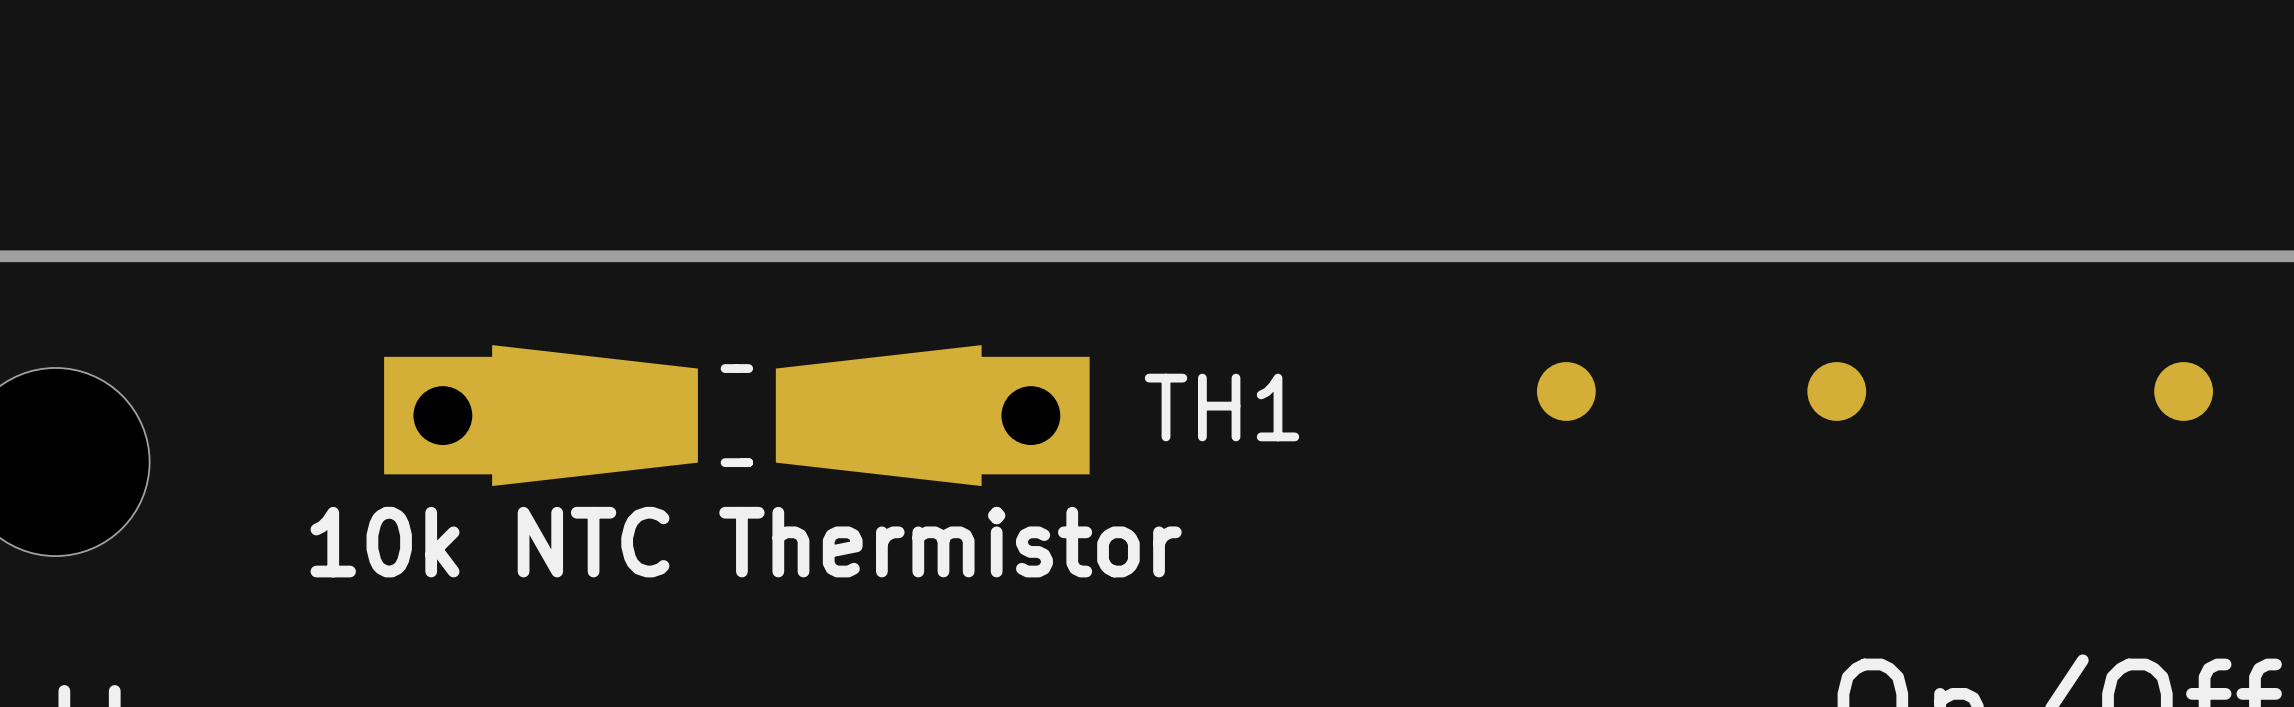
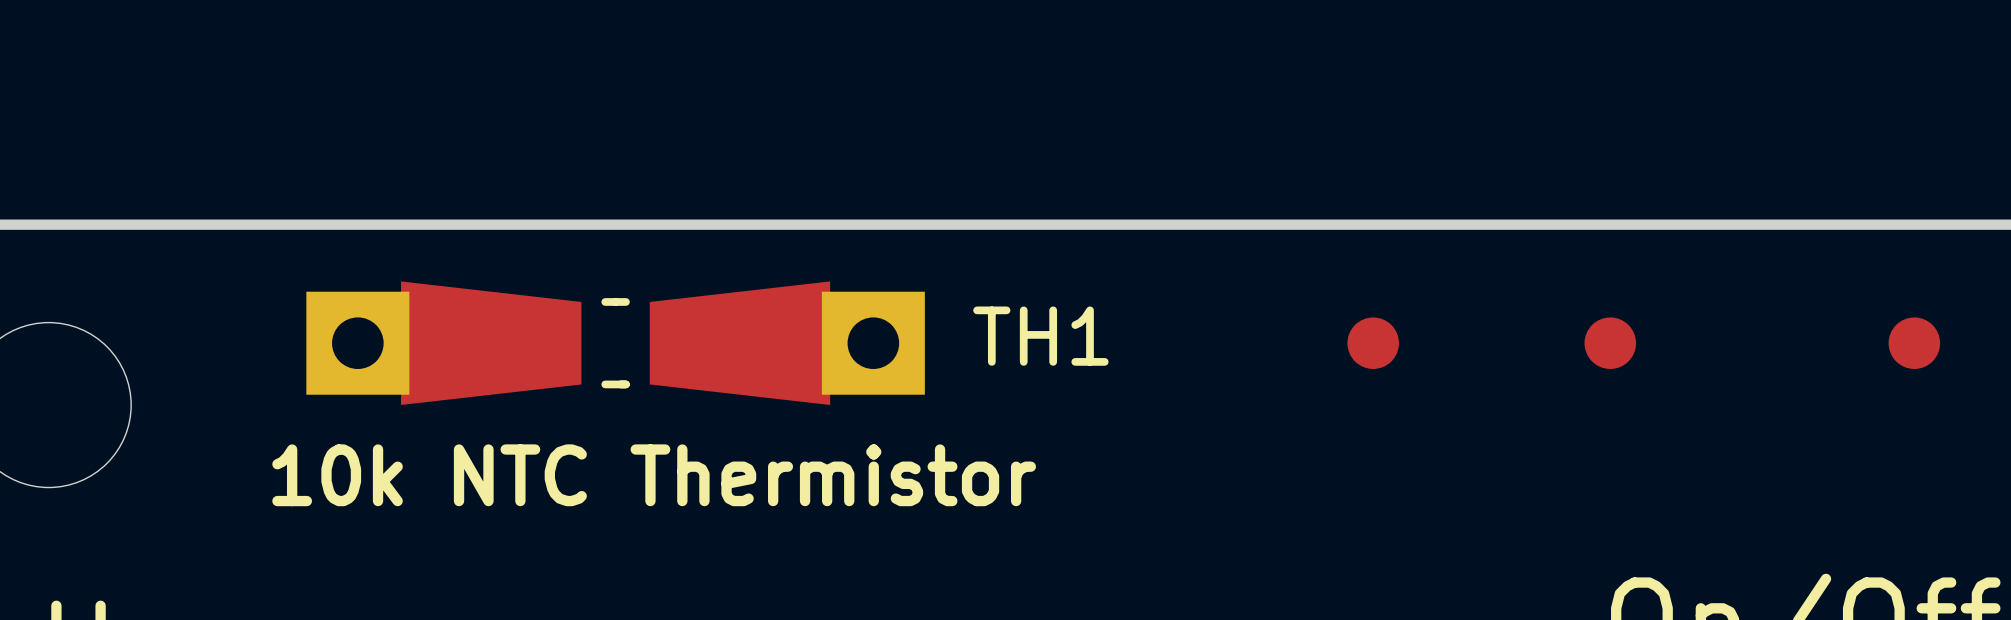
TH1 position: (736, 415) -> (615, 343)

